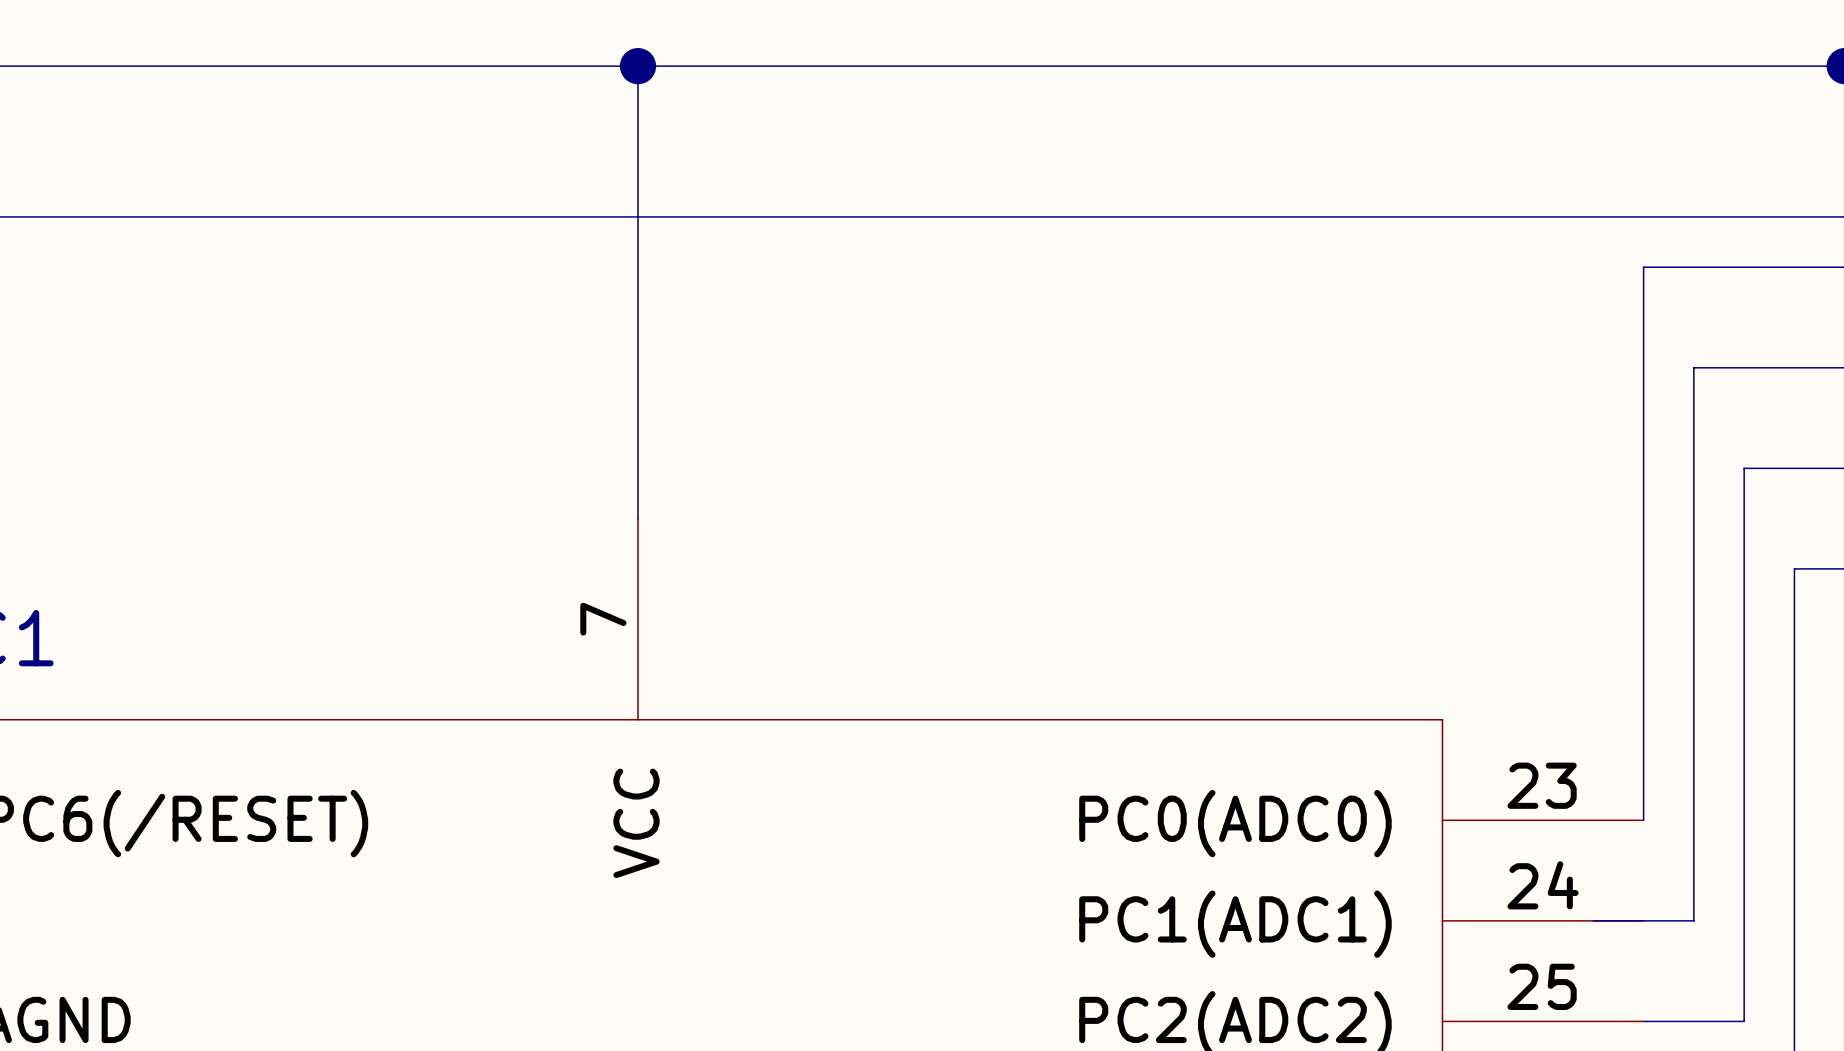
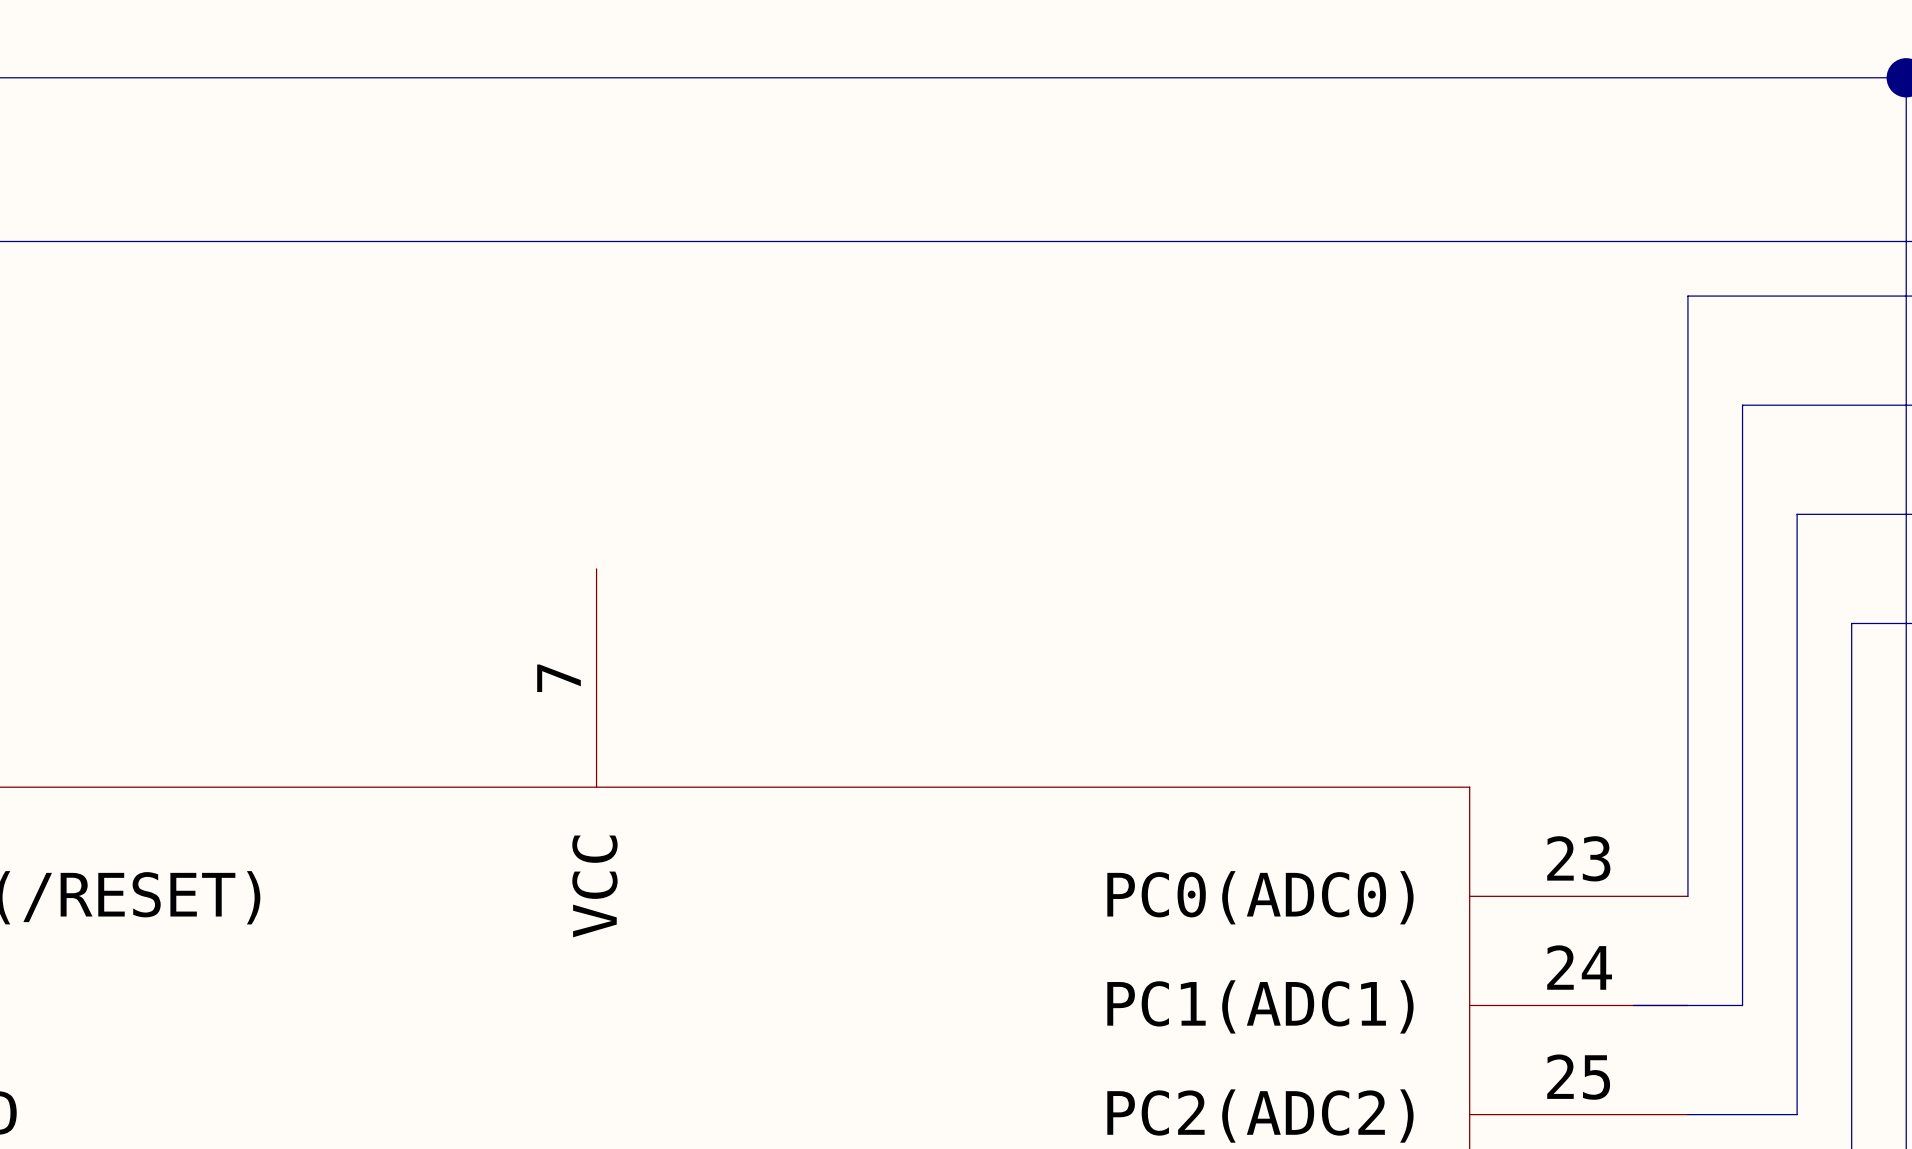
wire: (638, 66) (638, 518) -> none
junction: (638, 66) -> none

